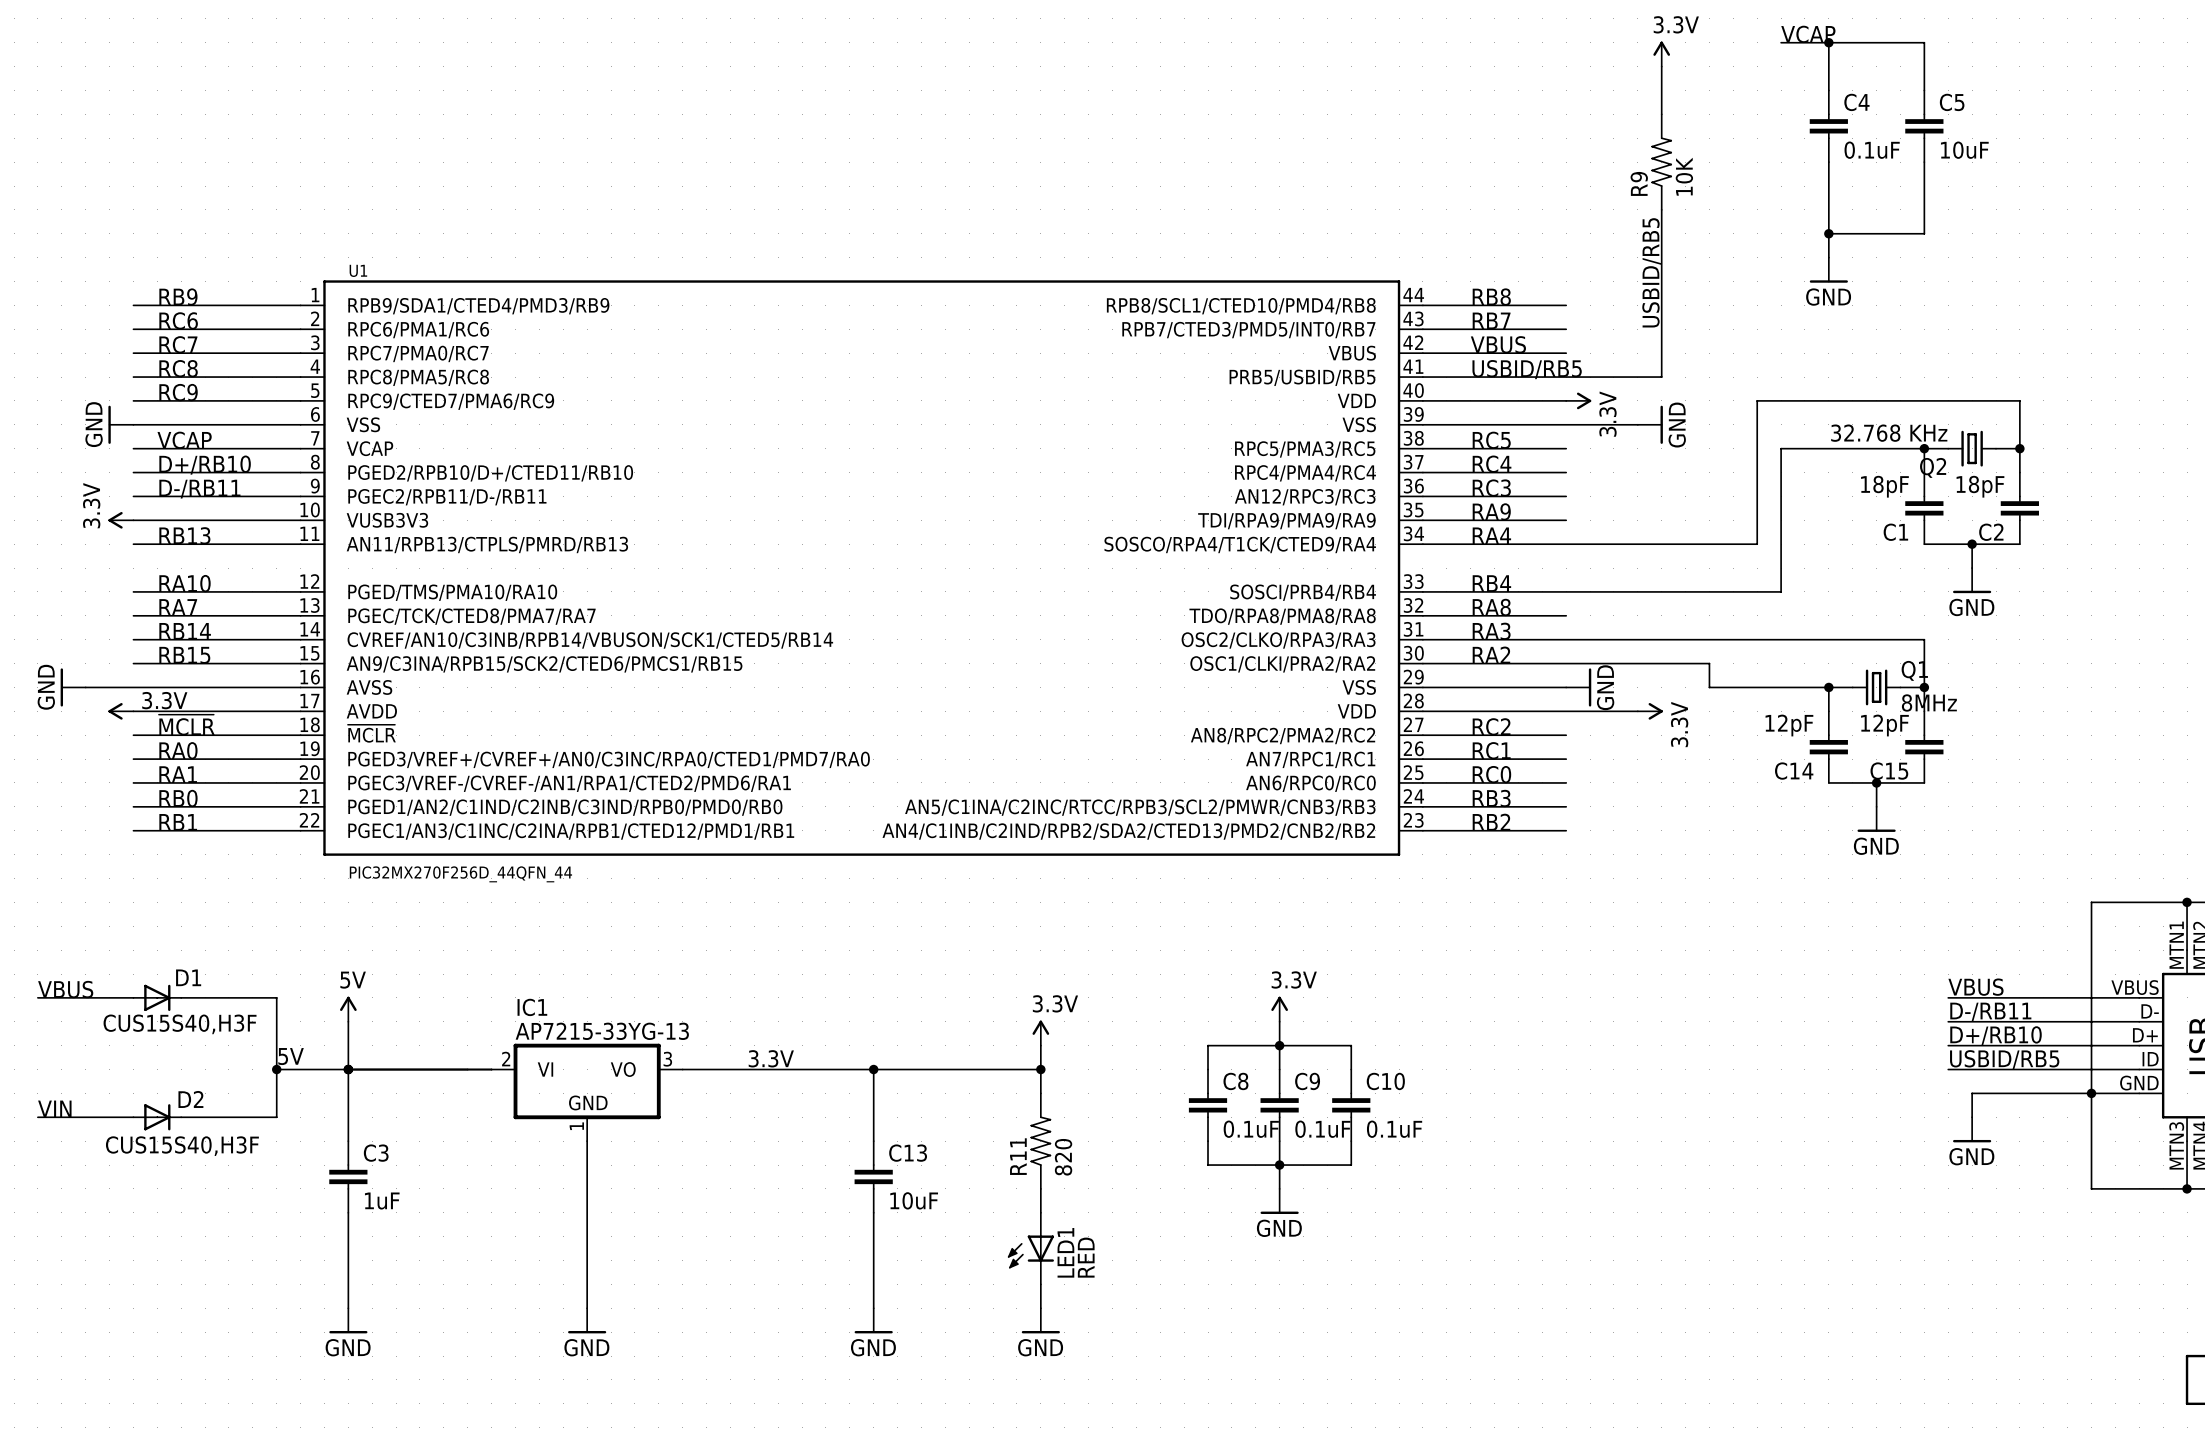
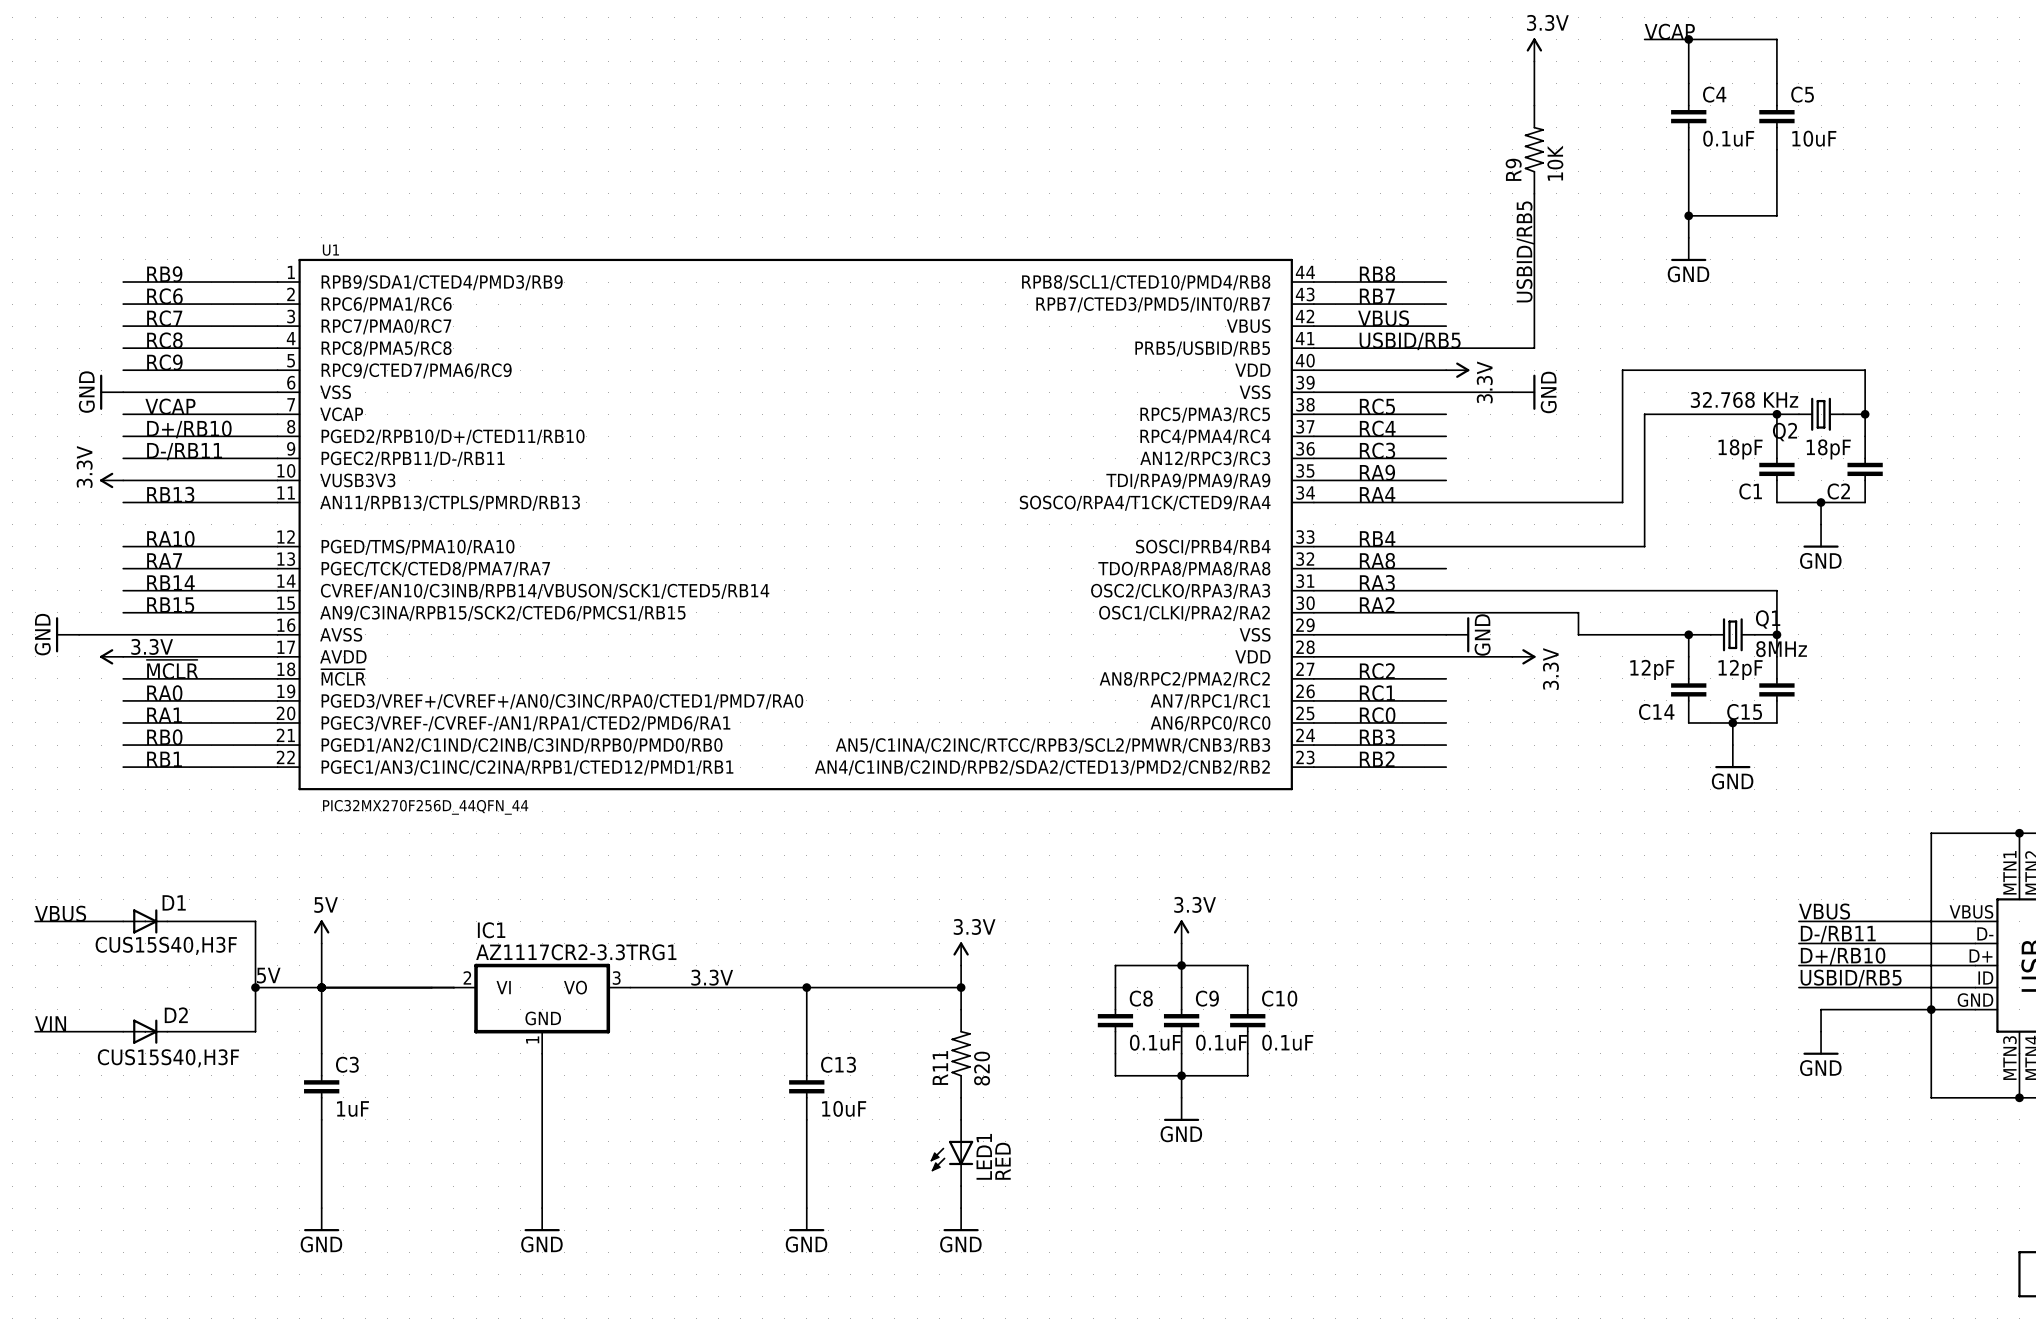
IC1 value: AP7215-33YG-13 (602, 1031) -> AZ1117CR2-3.3TRG1 (576, 952)

